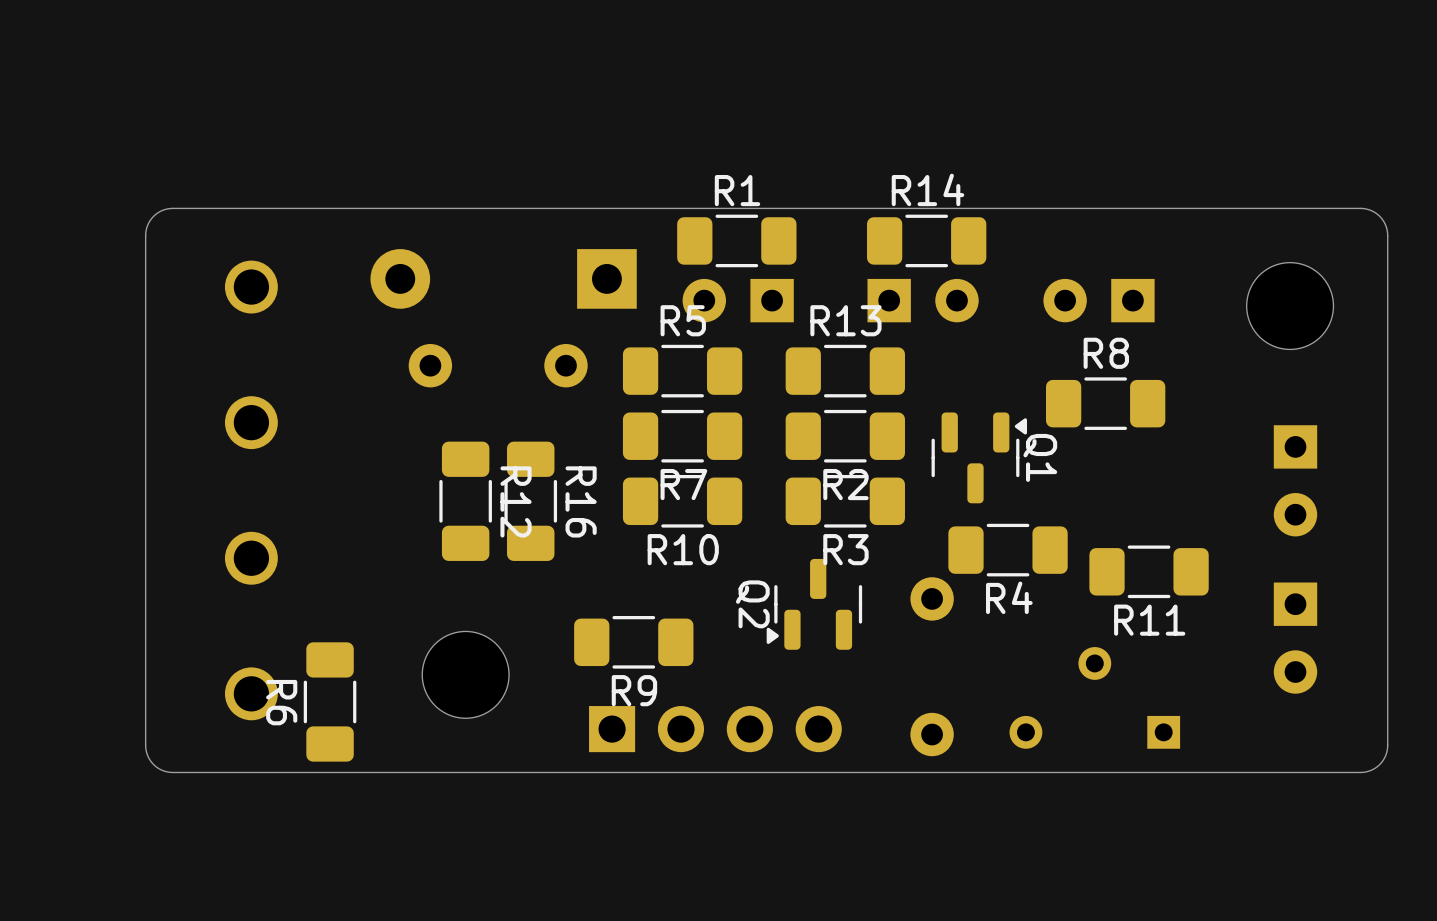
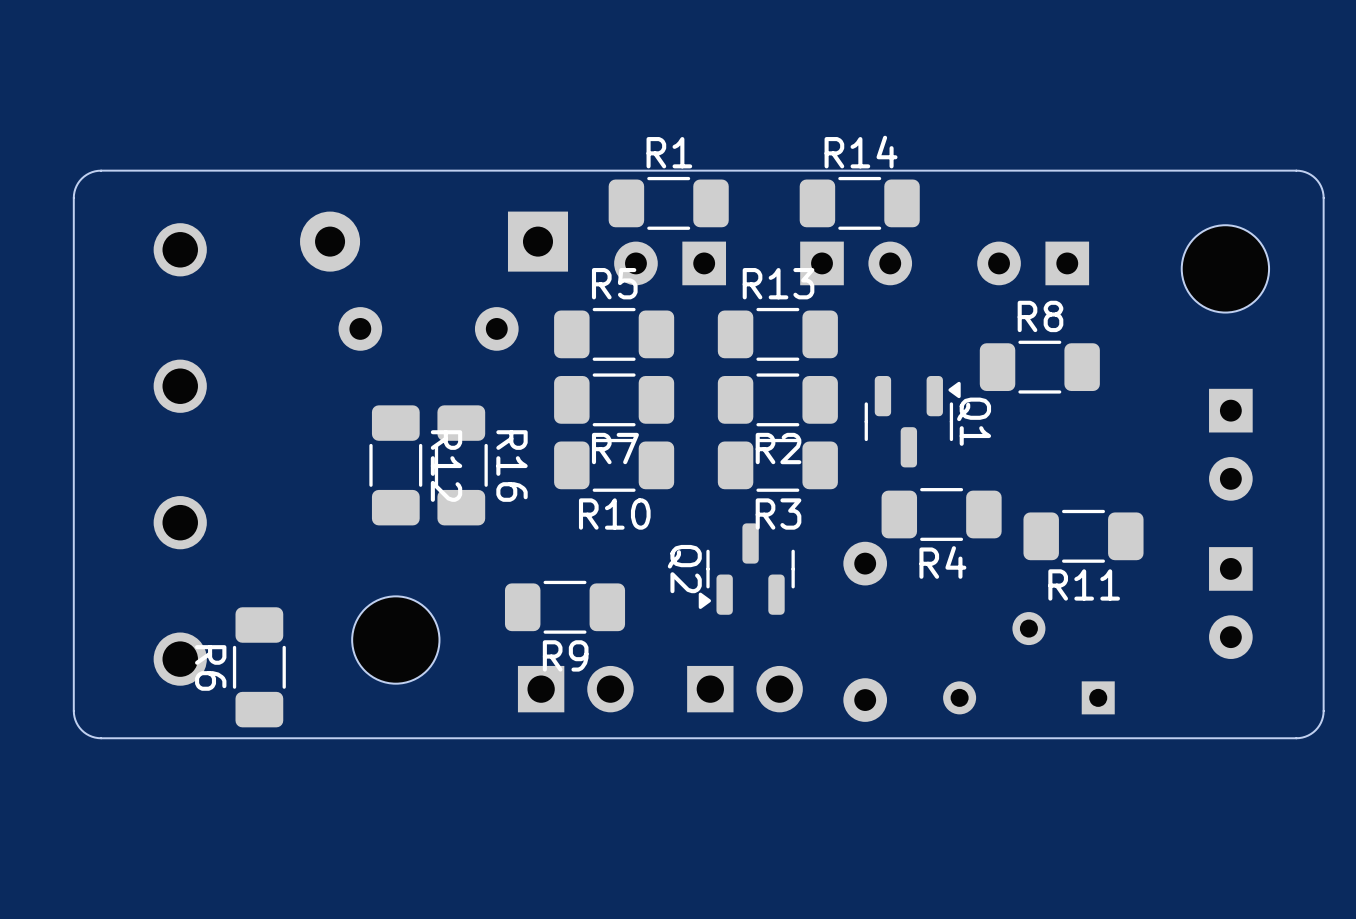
part: none -> (575, 689)
part: none -> (744, 689)
part: (715, 729) -> none

